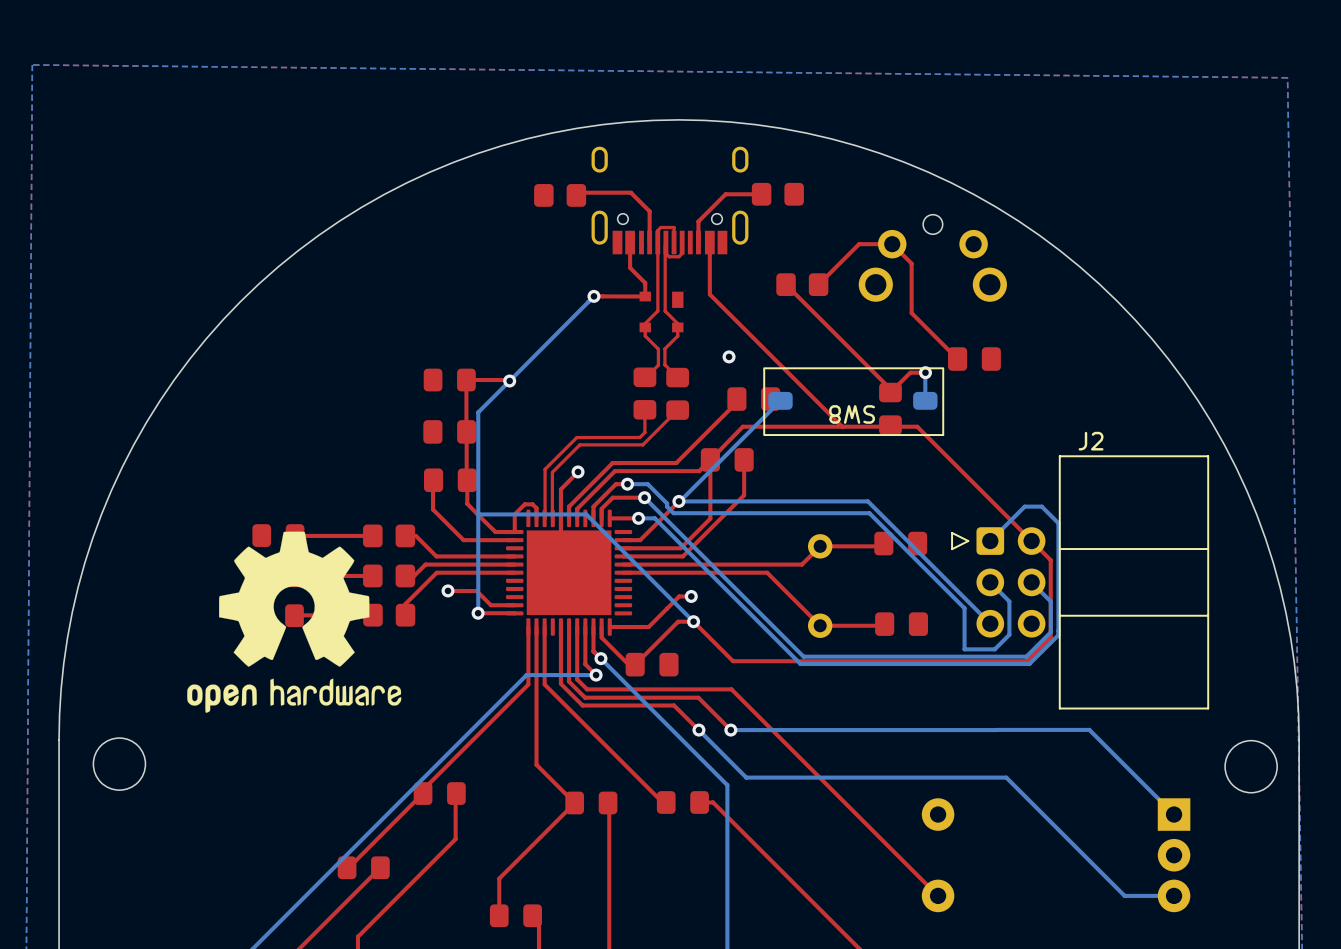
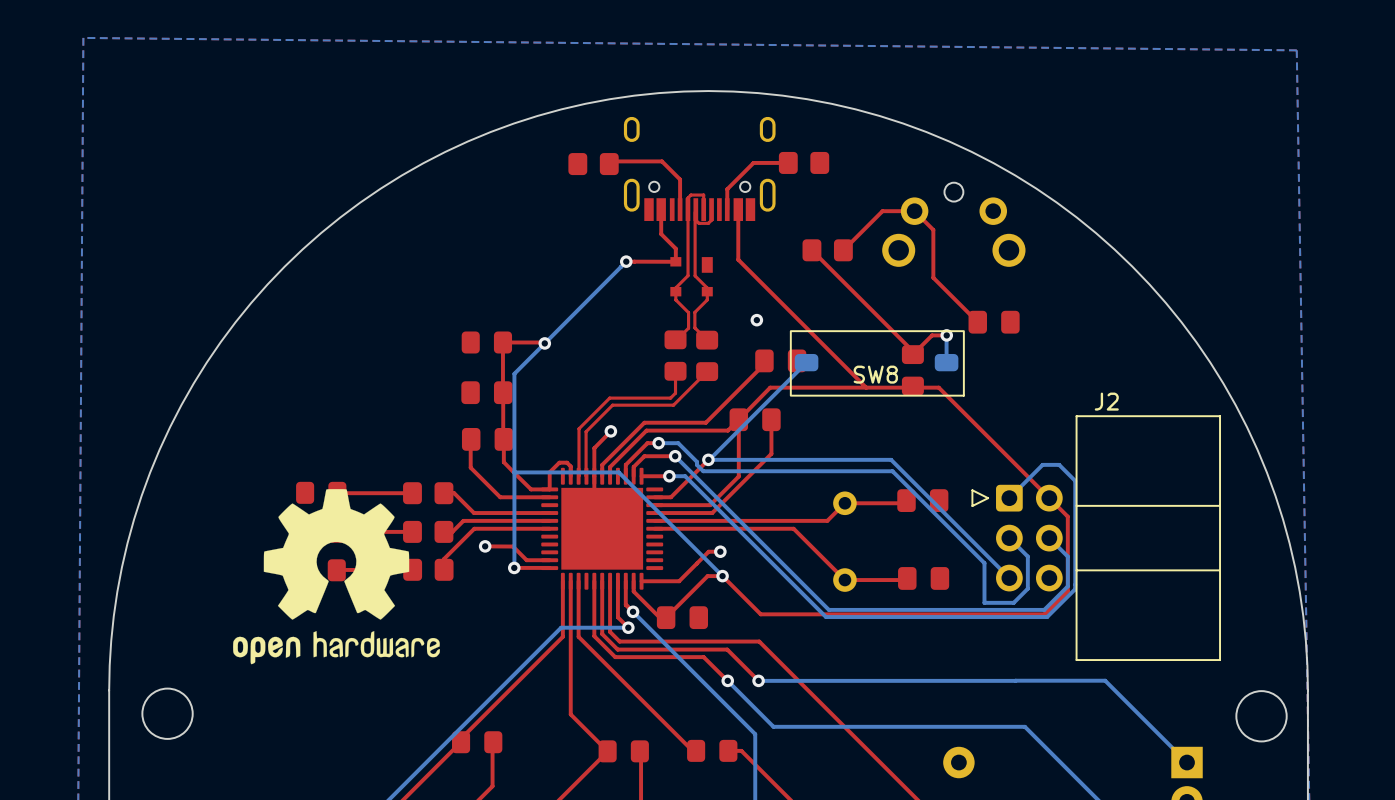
SW8 name rotation: 0° (852, 414) -> 180° (875, 374)

